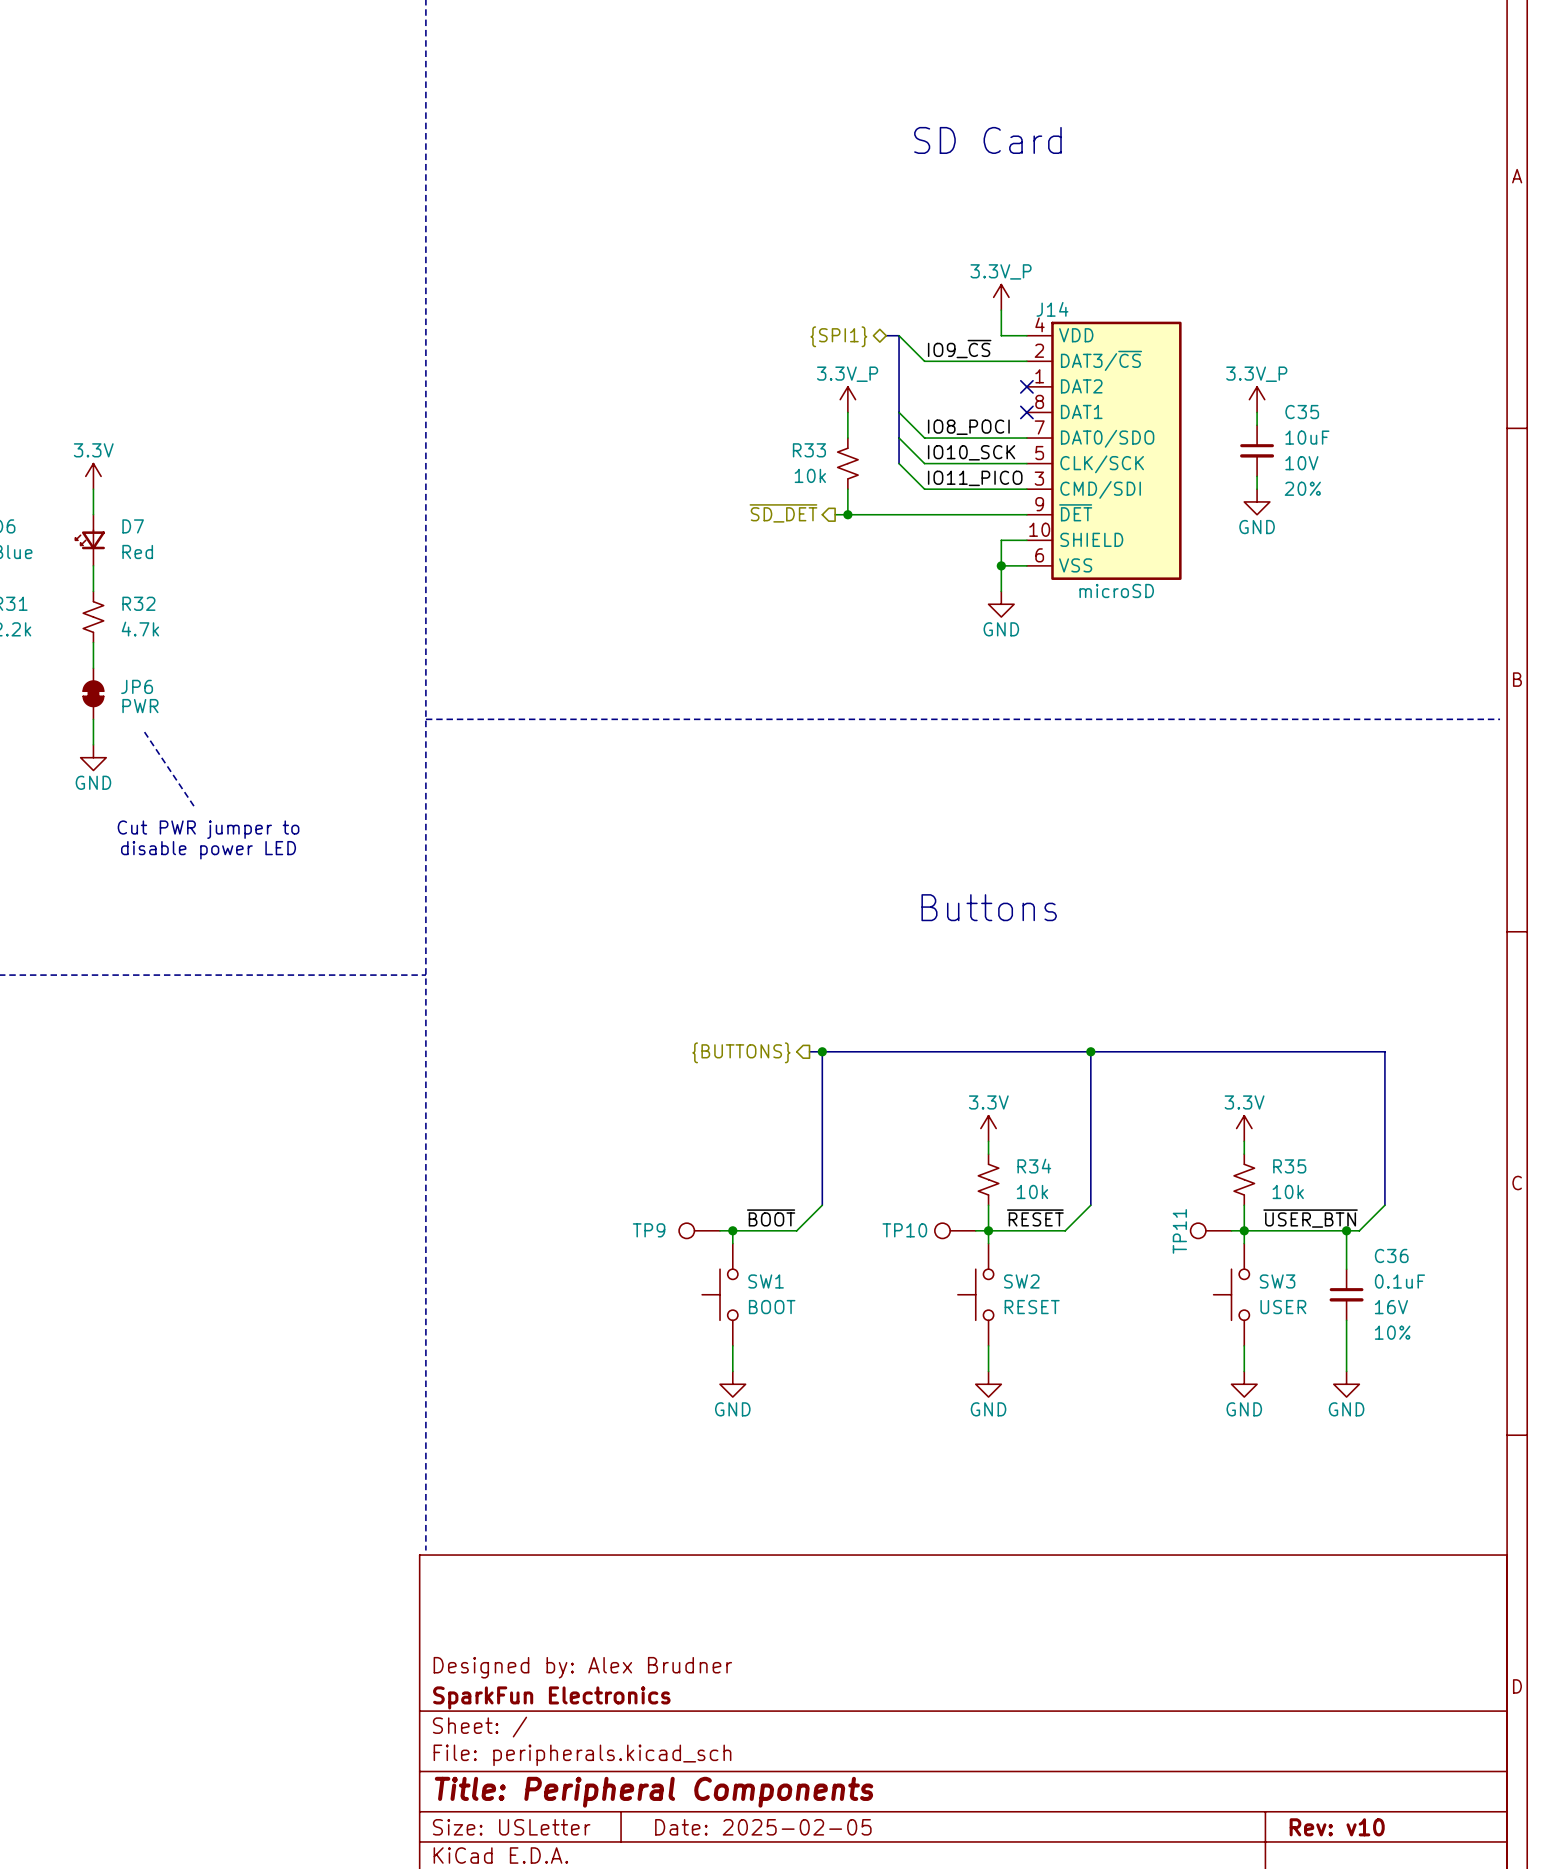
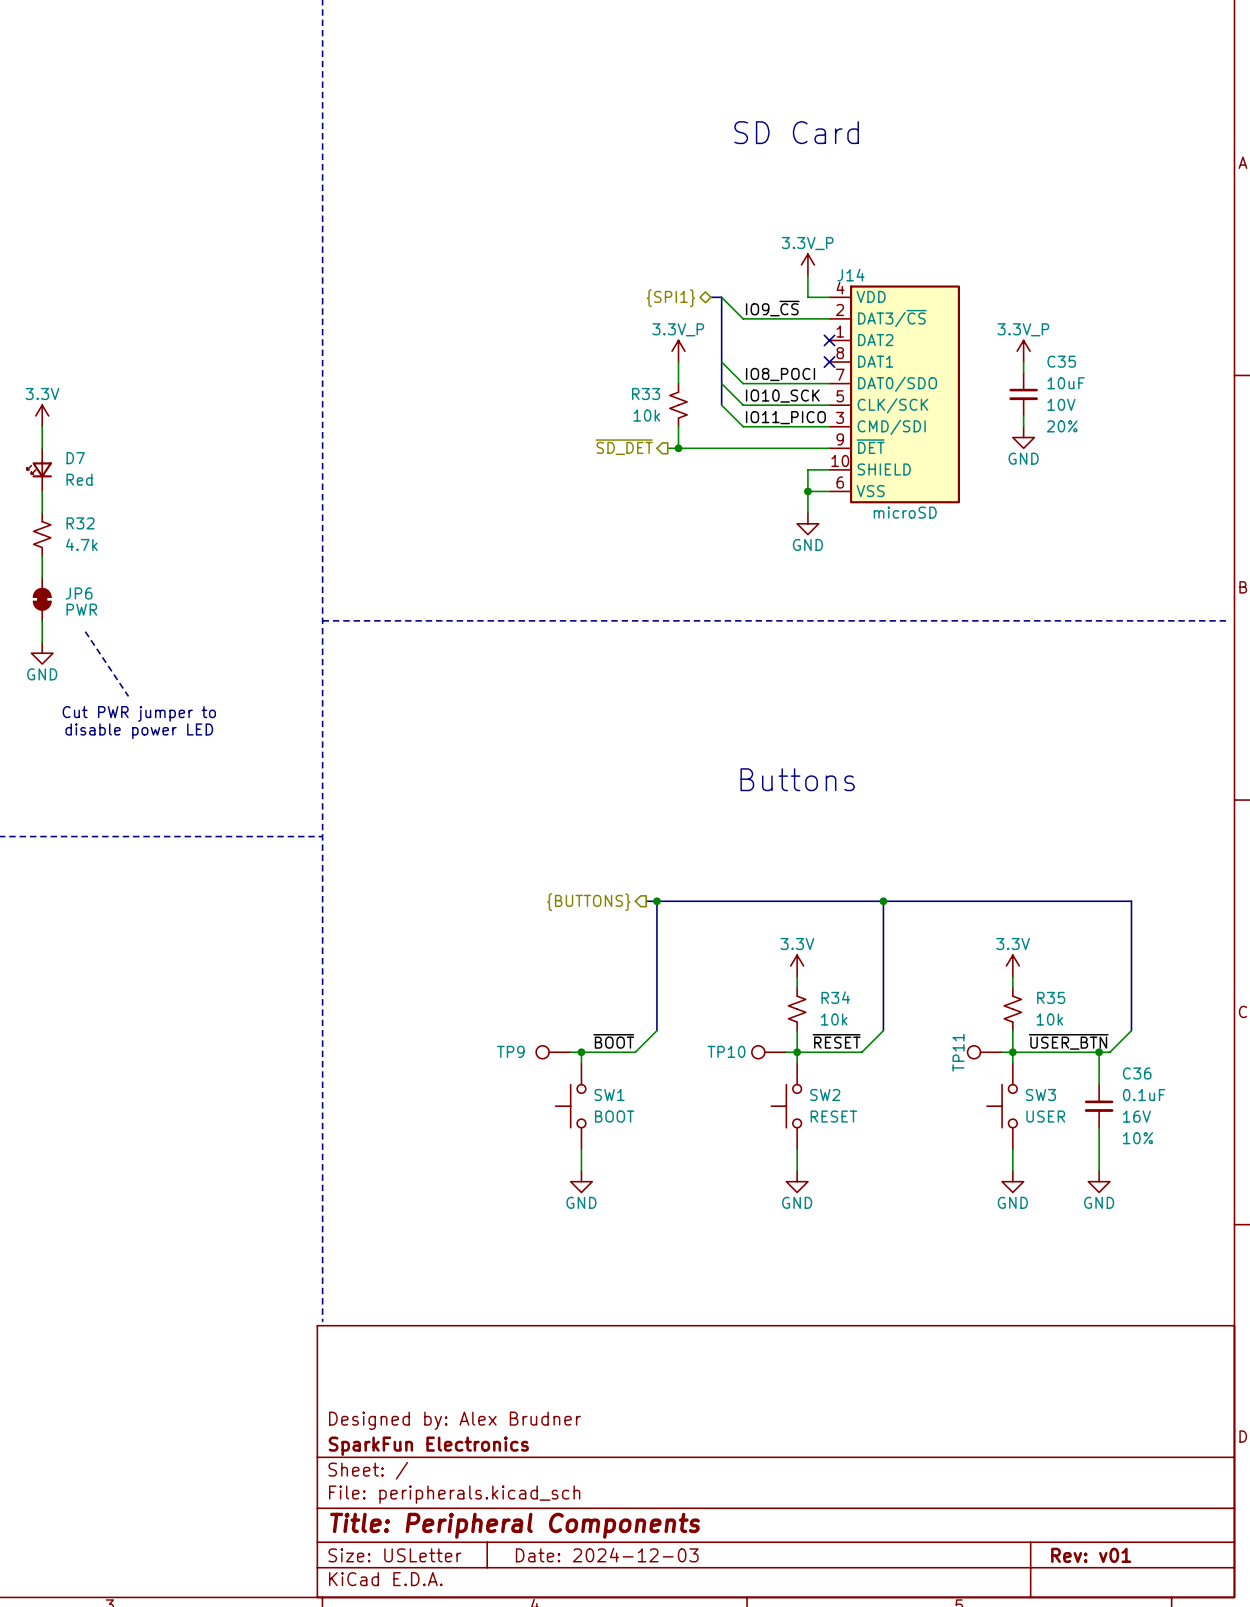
title block: Date: 2025-02-05 (763, 1827) -> Date: 2024-12-03 (607, 1555)
title block: Rev: v10 (1337, 1827) -> Rev: v01 (1091, 1555)

